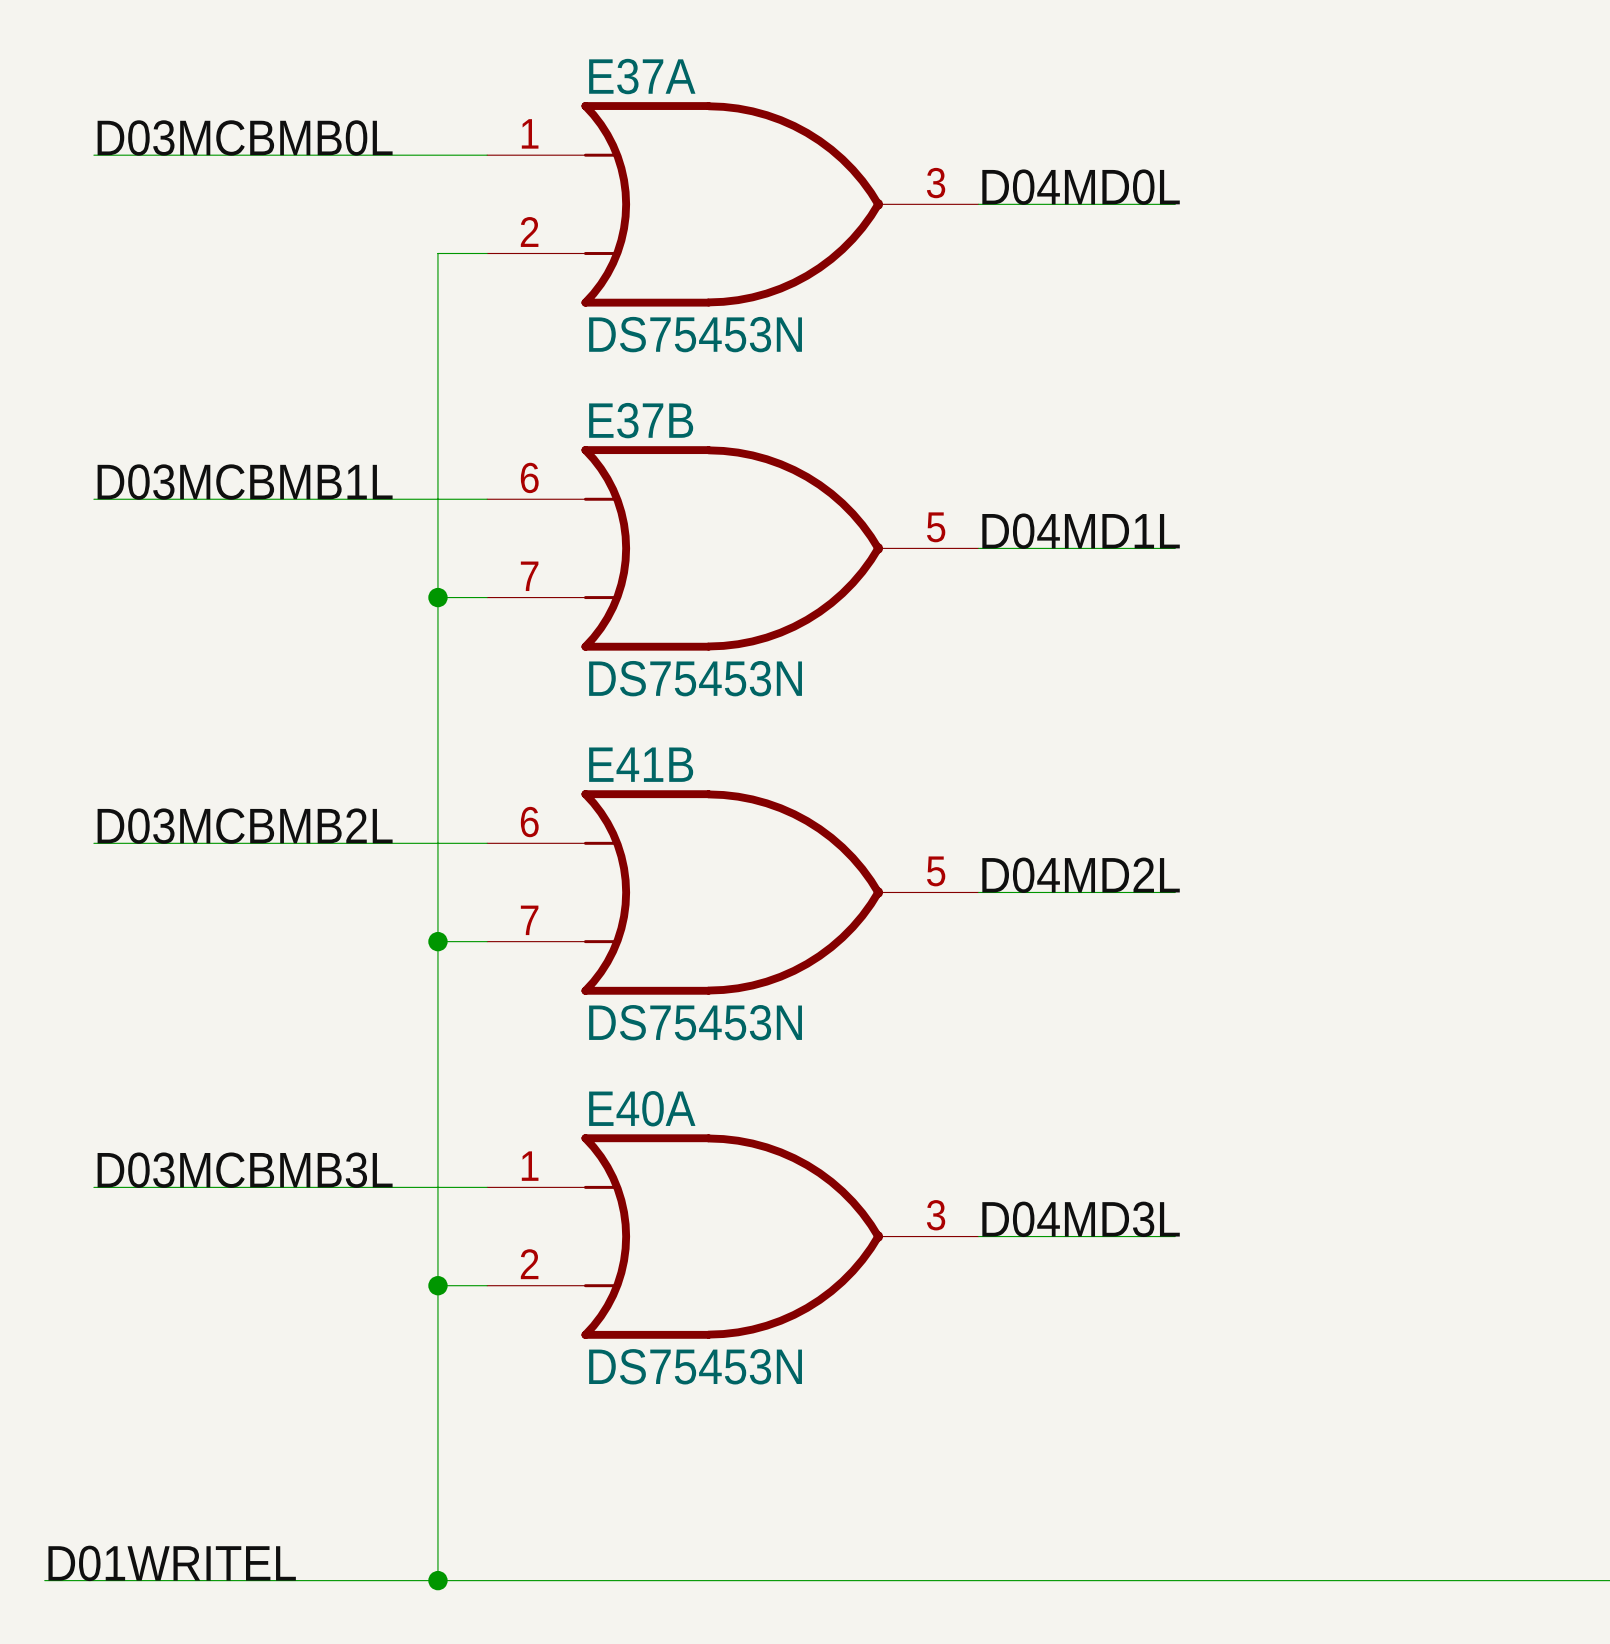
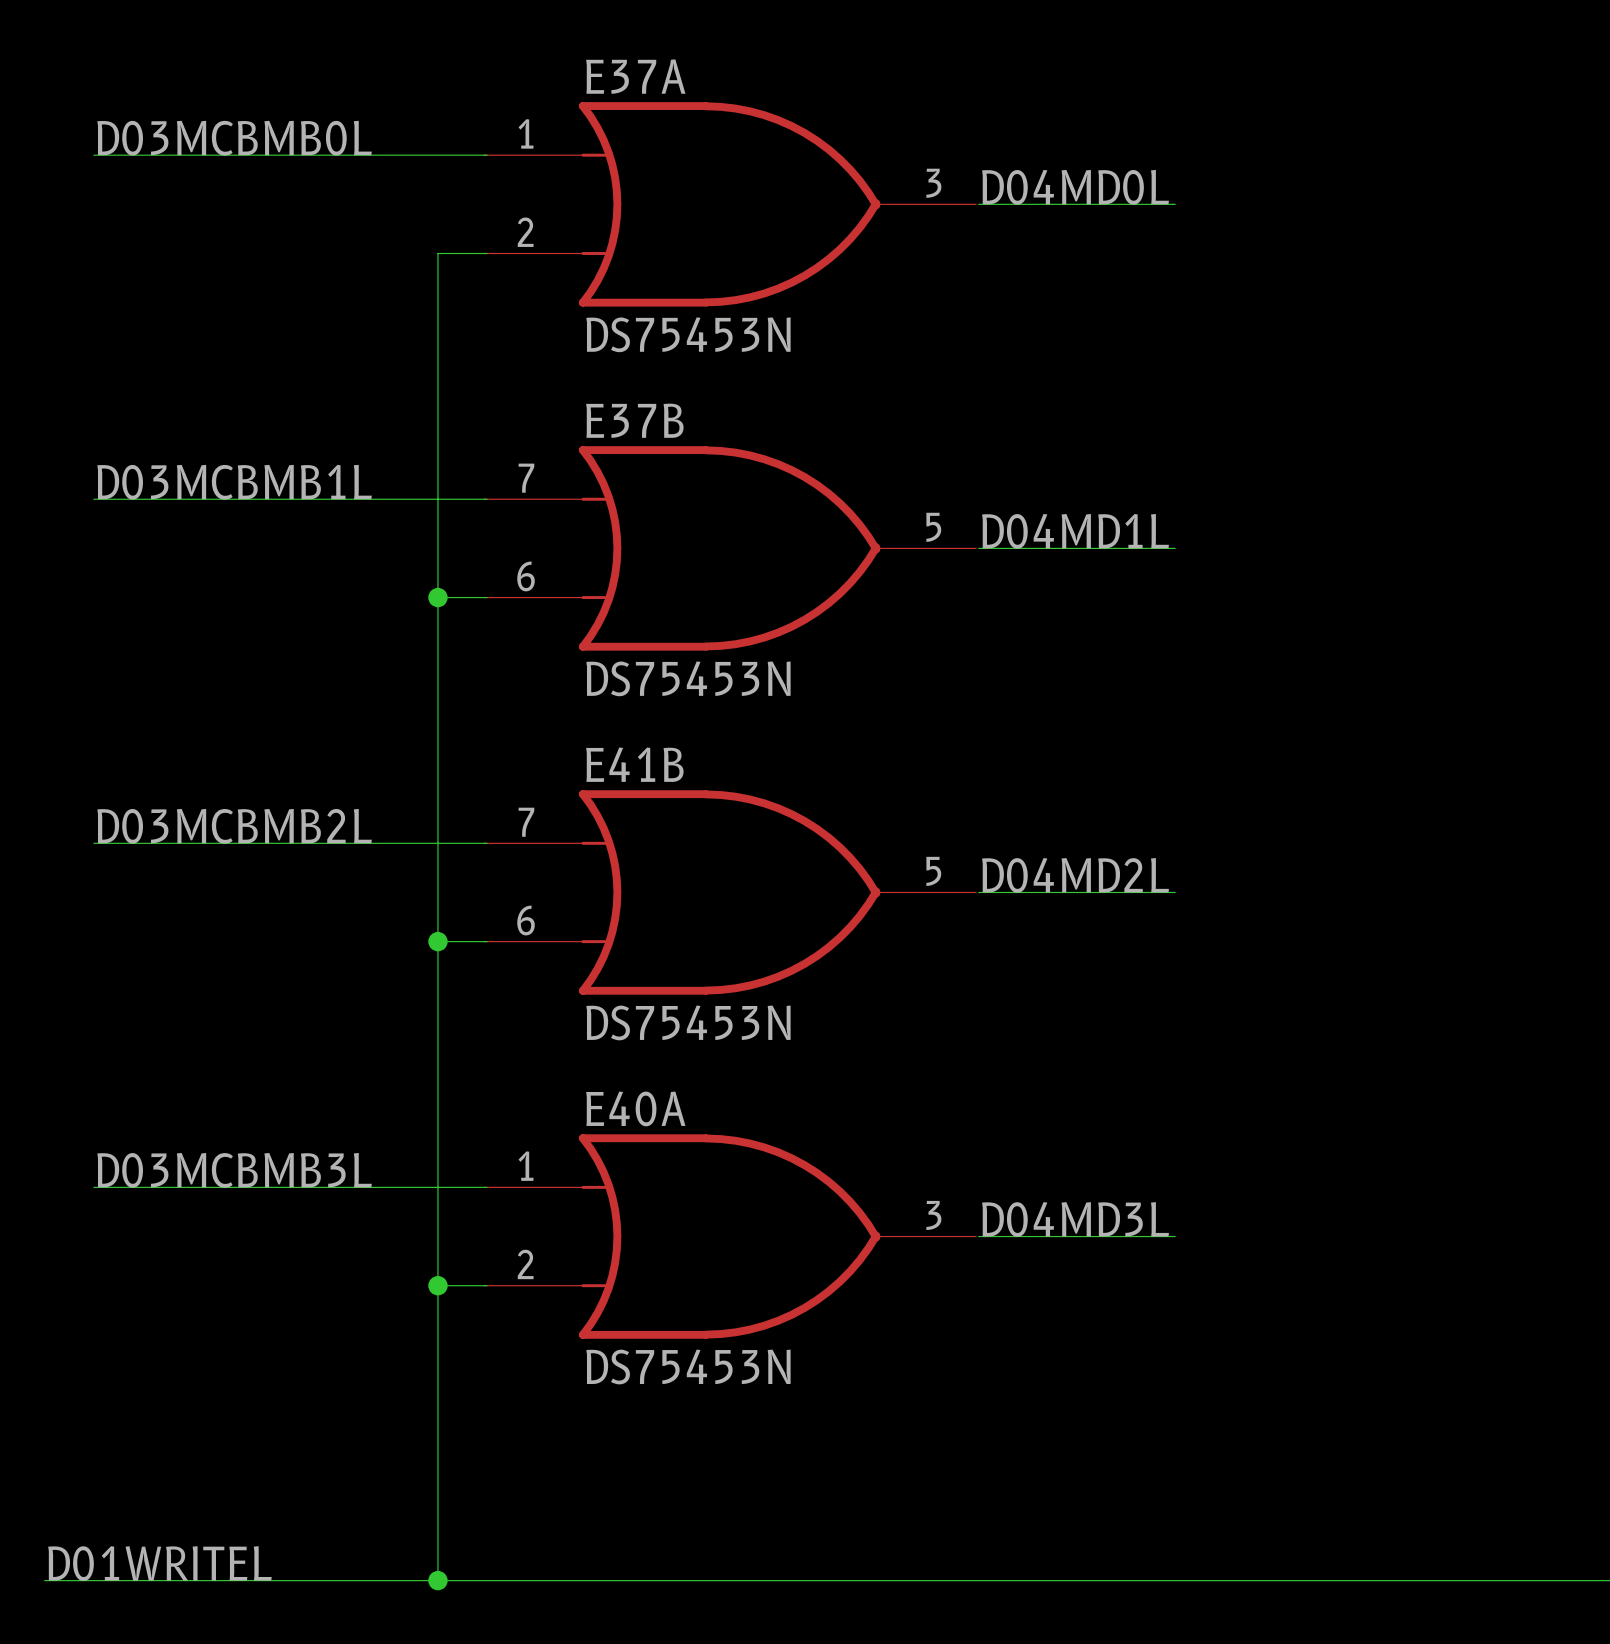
E37A symbol: [487, 102, 979, 307] -> [484, 102, 977, 307]
E37B symbol: [487, 446, 979, 651] -> [484, 446, 977, 651]
E41B symbol: [487, 790, 979, 995] -> [484, 790, 977, 995]
E40A symbol: [487, 1134, 979, 1339] -> [484, 1134, 977, 1339]

